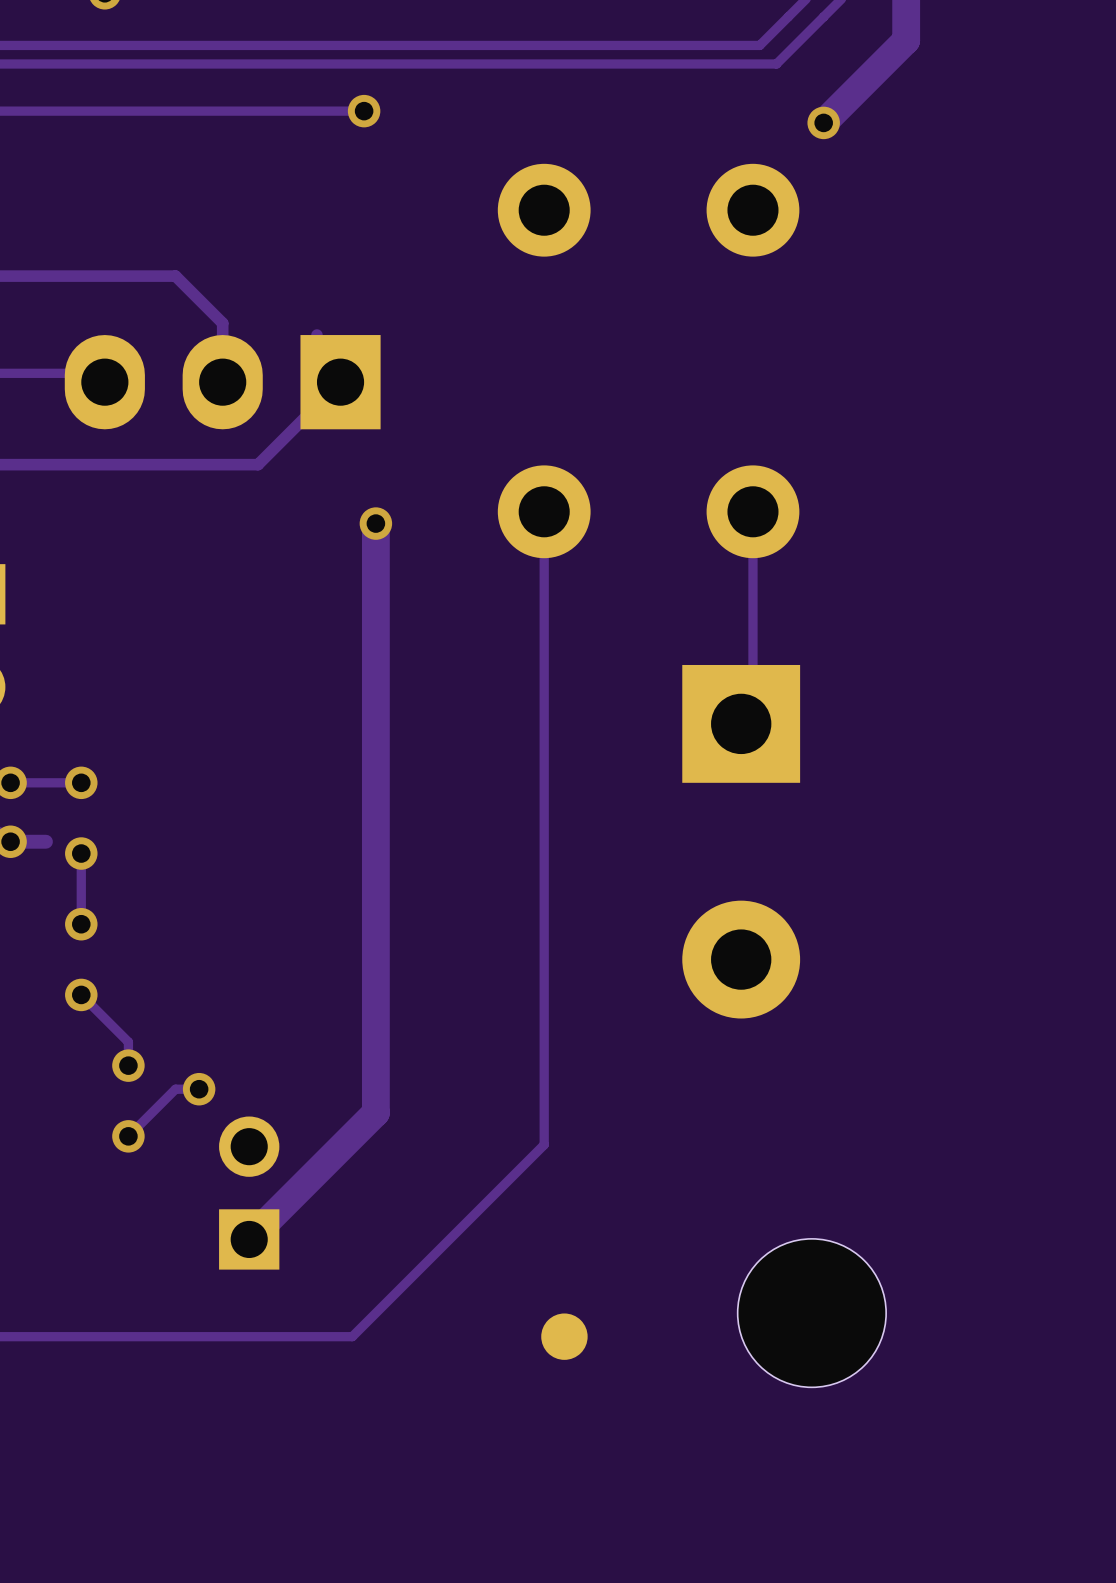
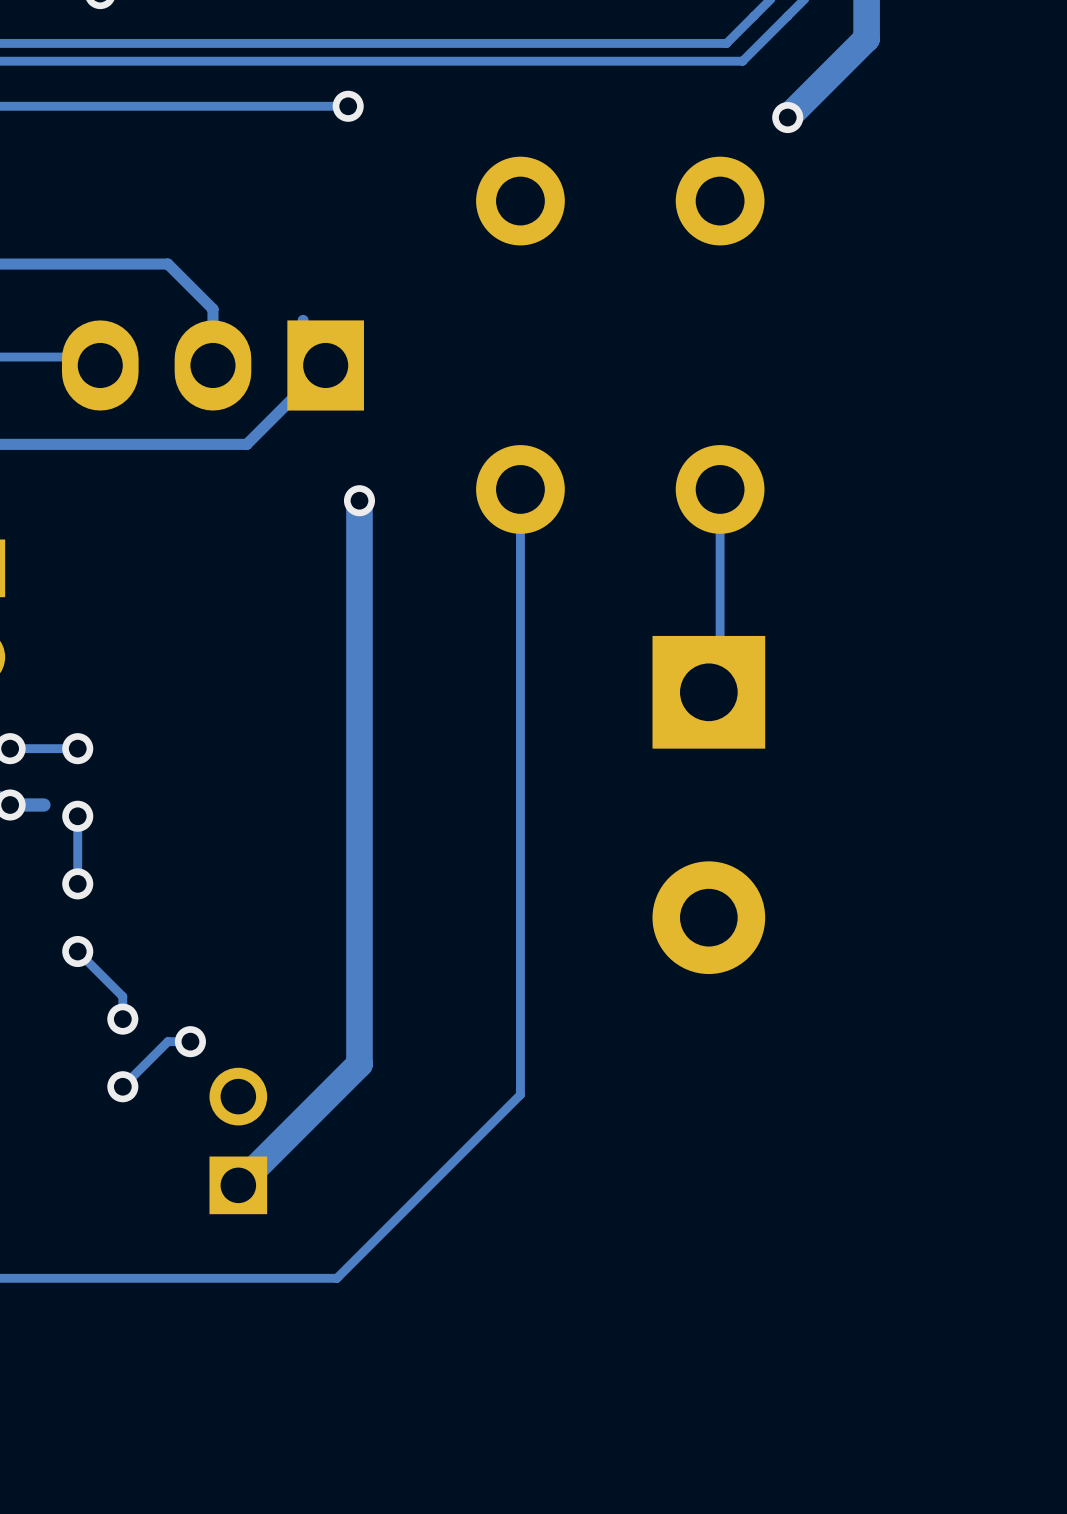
part: (811, 1313) -> none
part: (564, 1336) -> none

